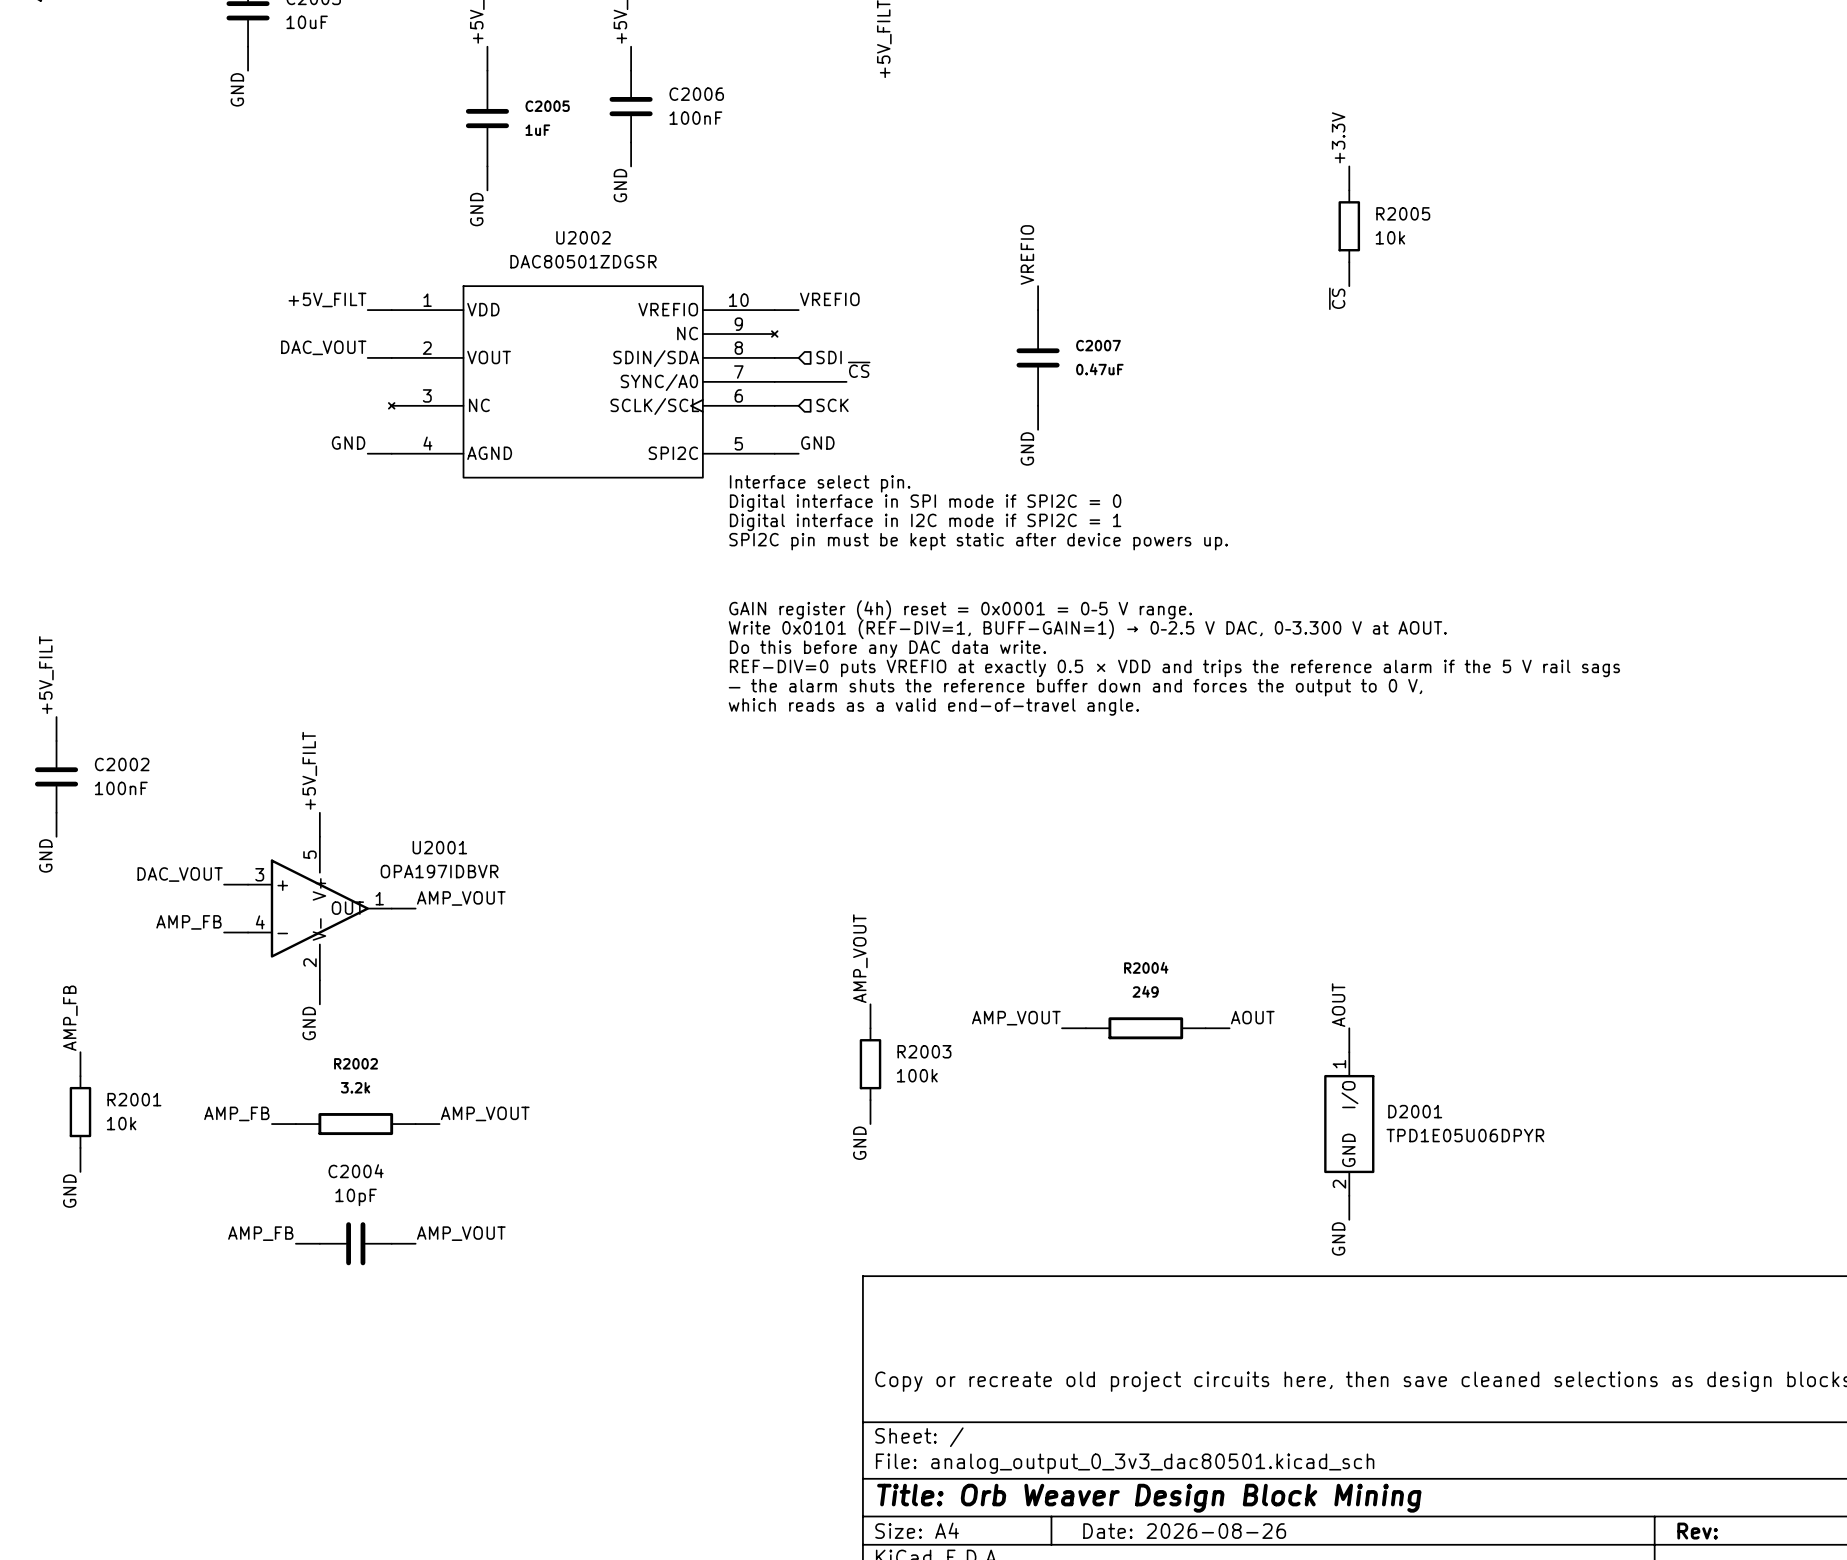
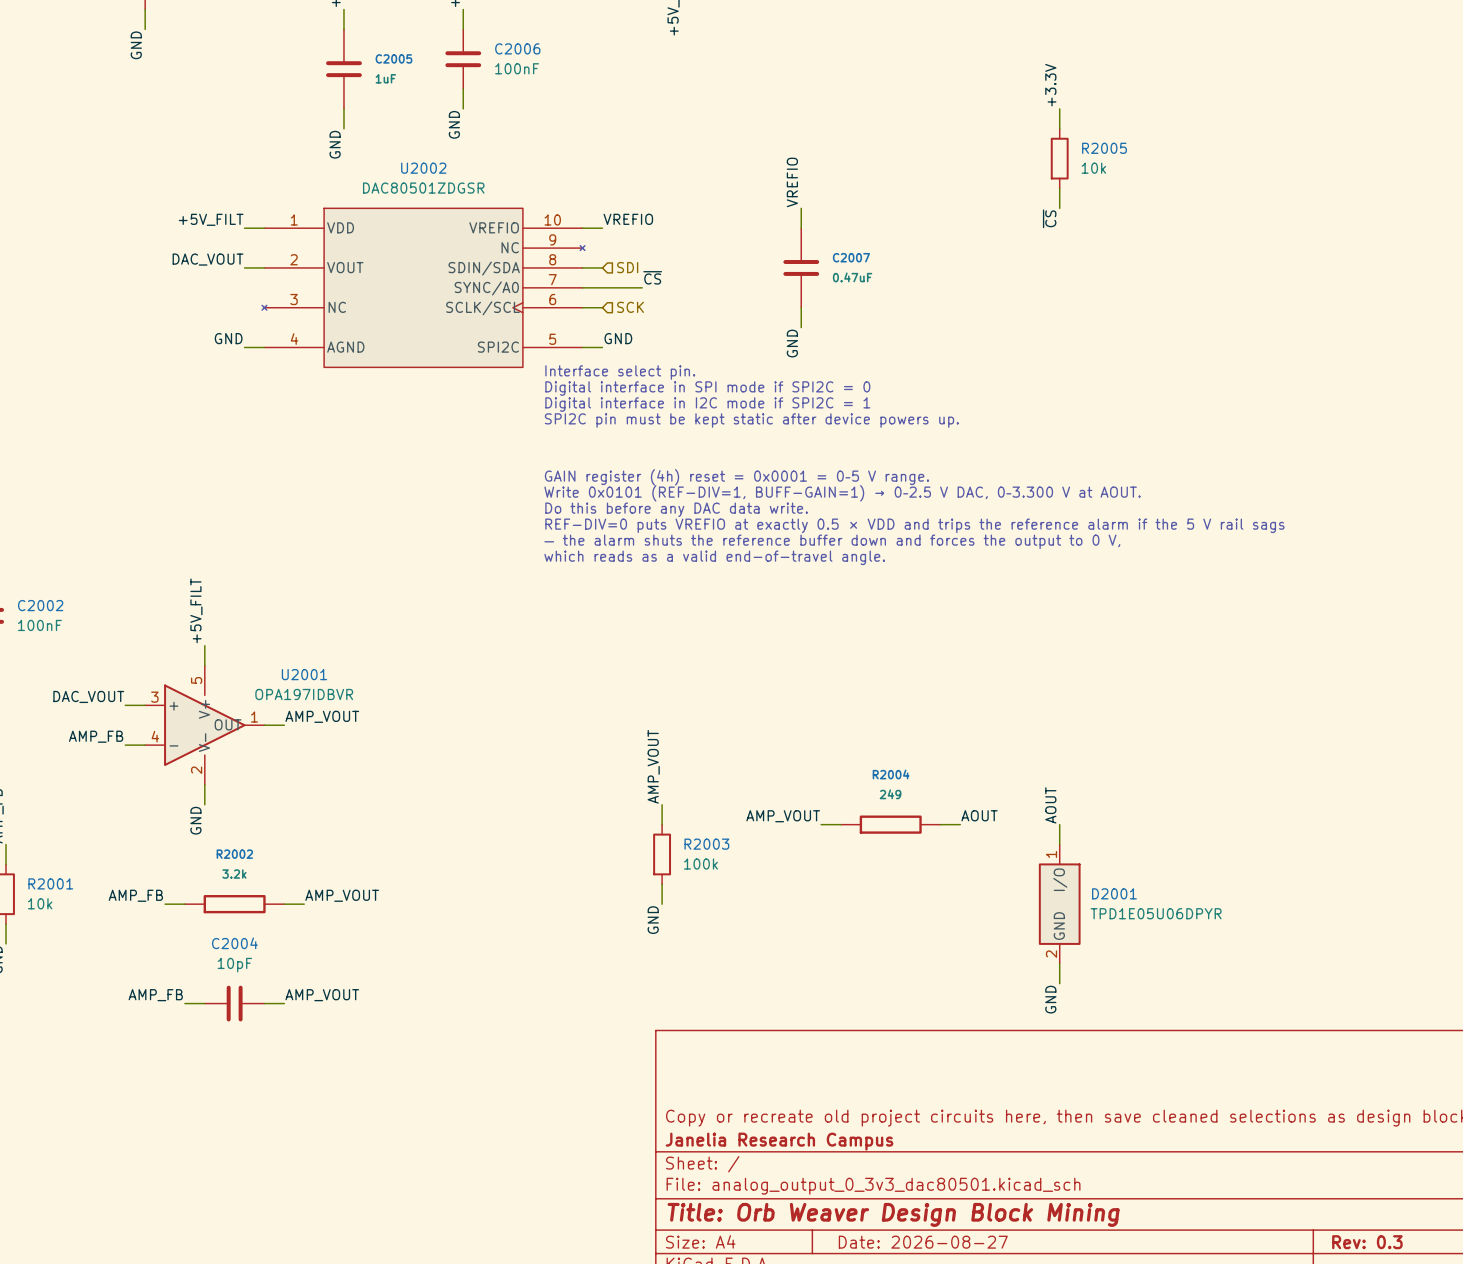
title block: none -> Janelia Research Campus (779, 1141)
title block: Date: 2026-08-26 (1184, 1531) -> Date: 2026-08-27 (923, 1242)
title block: Rev: (1697, 1531) -> Rev: 0.3 (1367, 1242)

